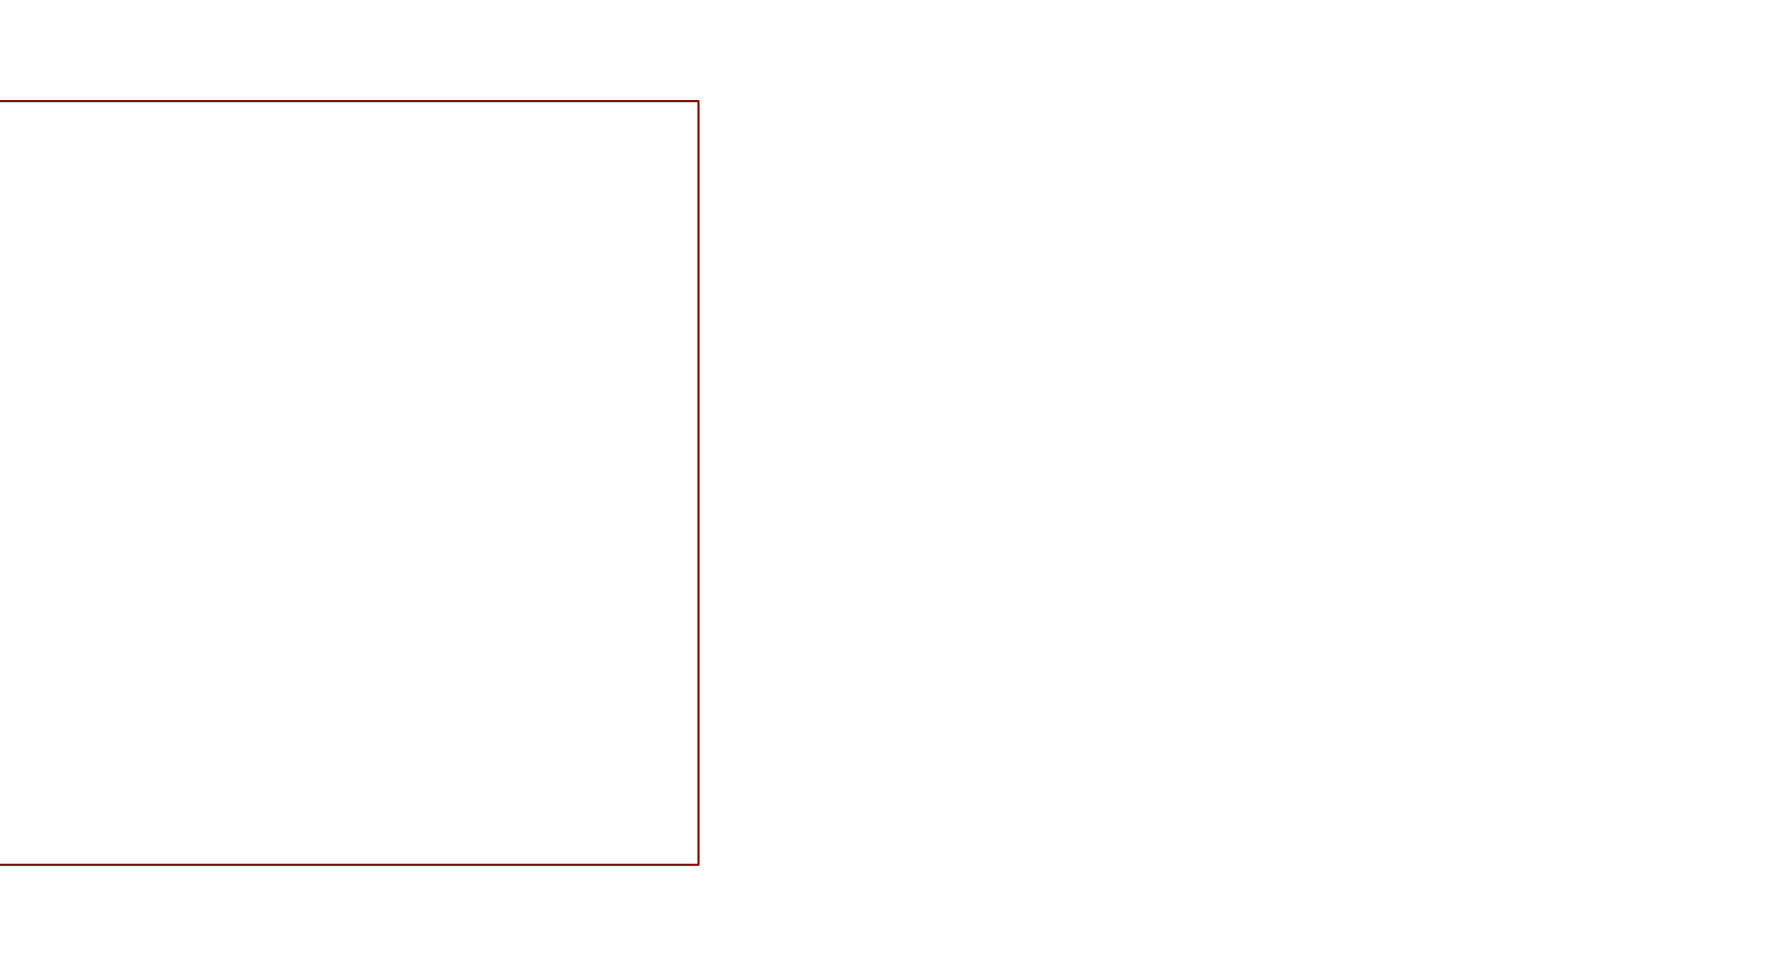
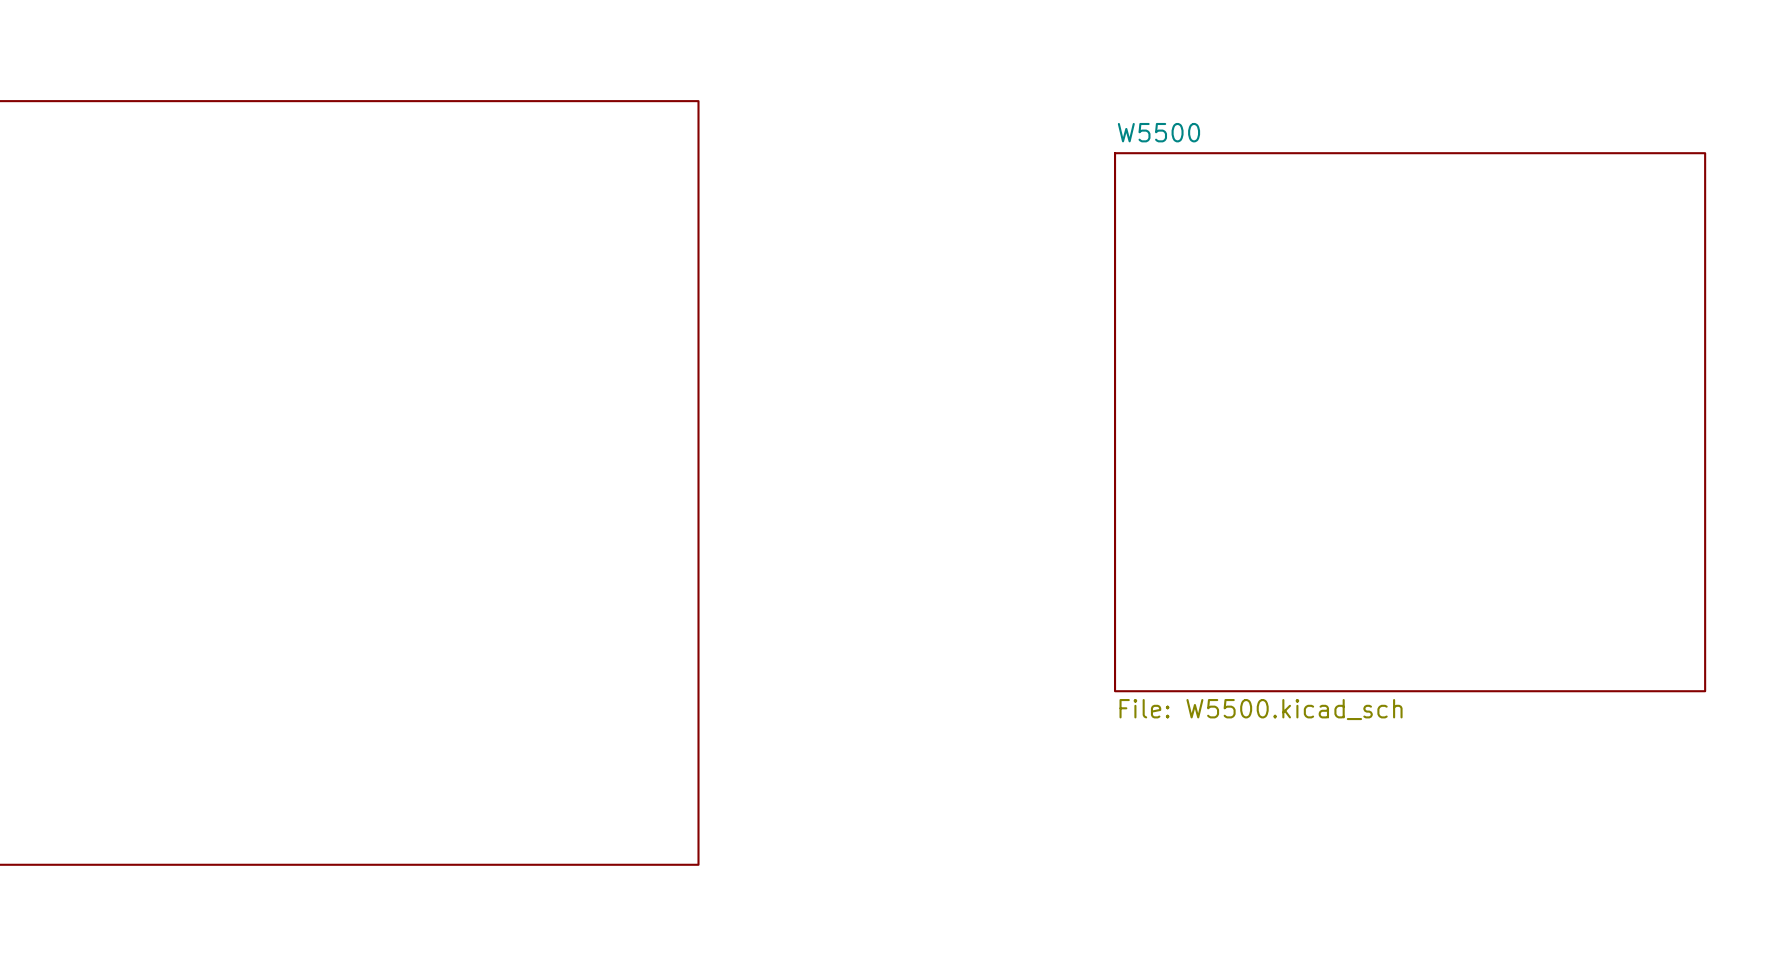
sheet W5500: none -> File: W5500.kicad_sch (1410, 422)

